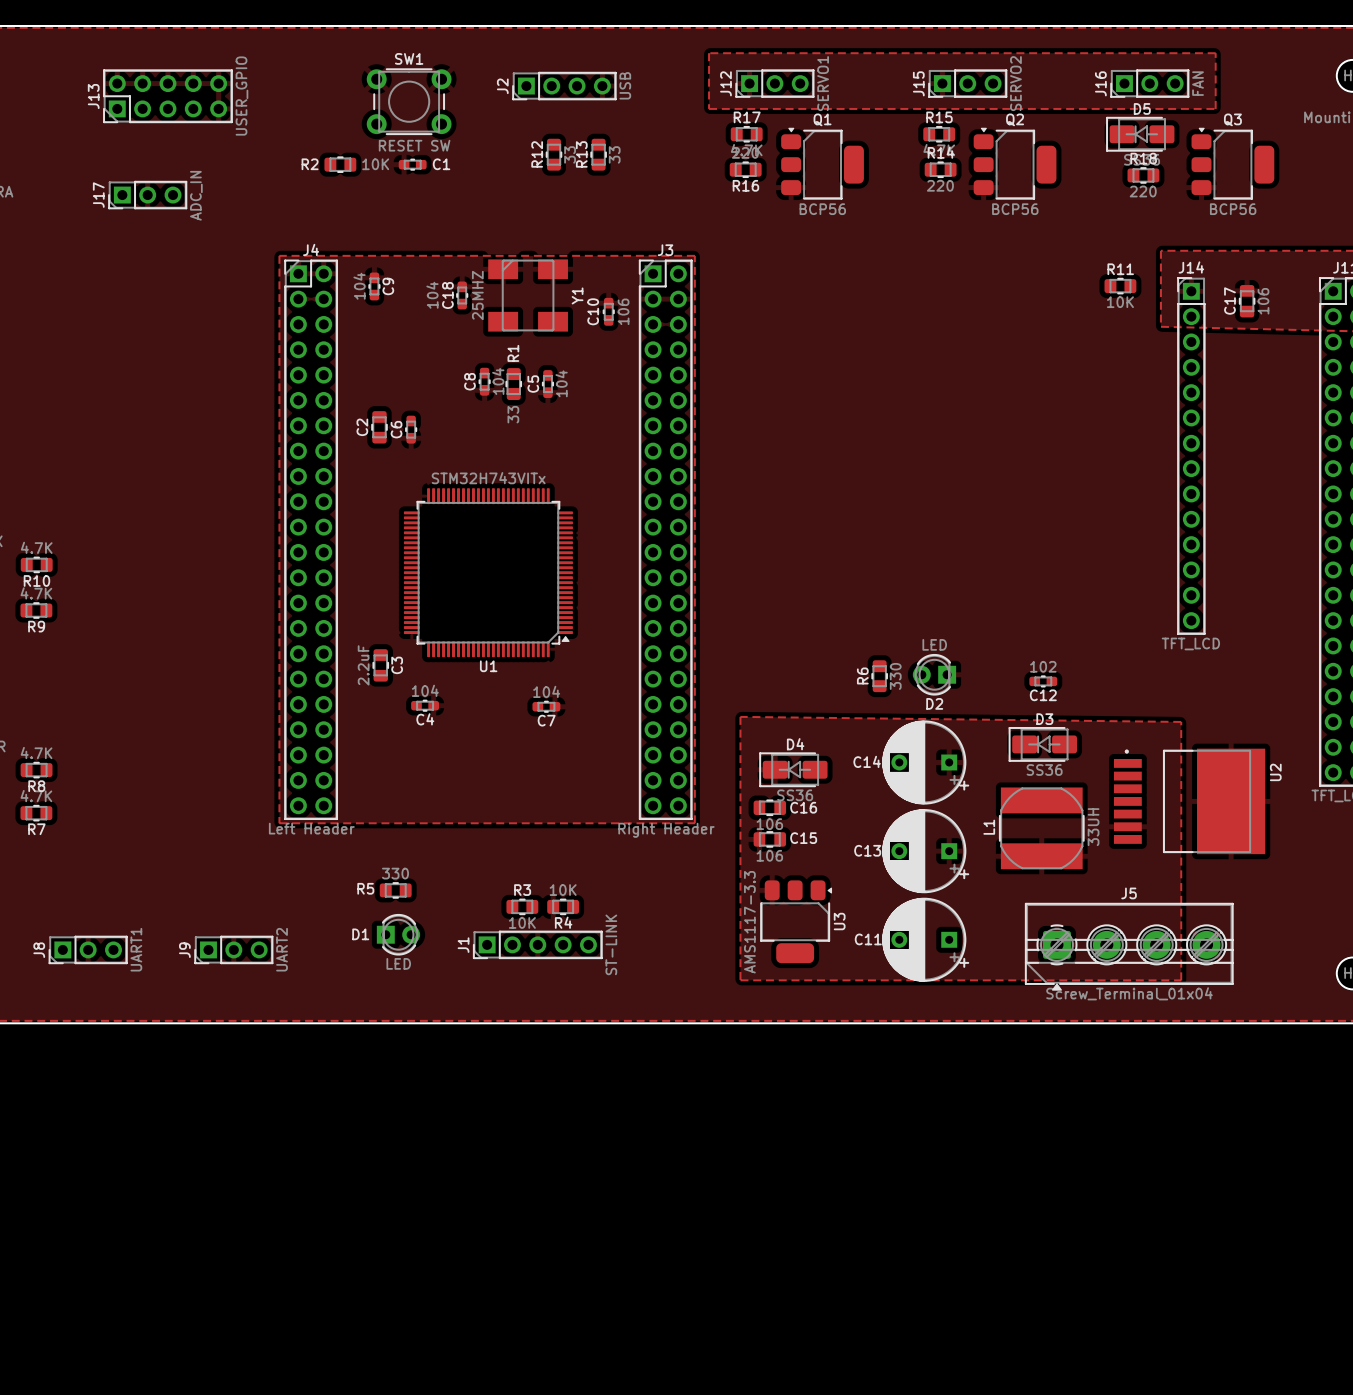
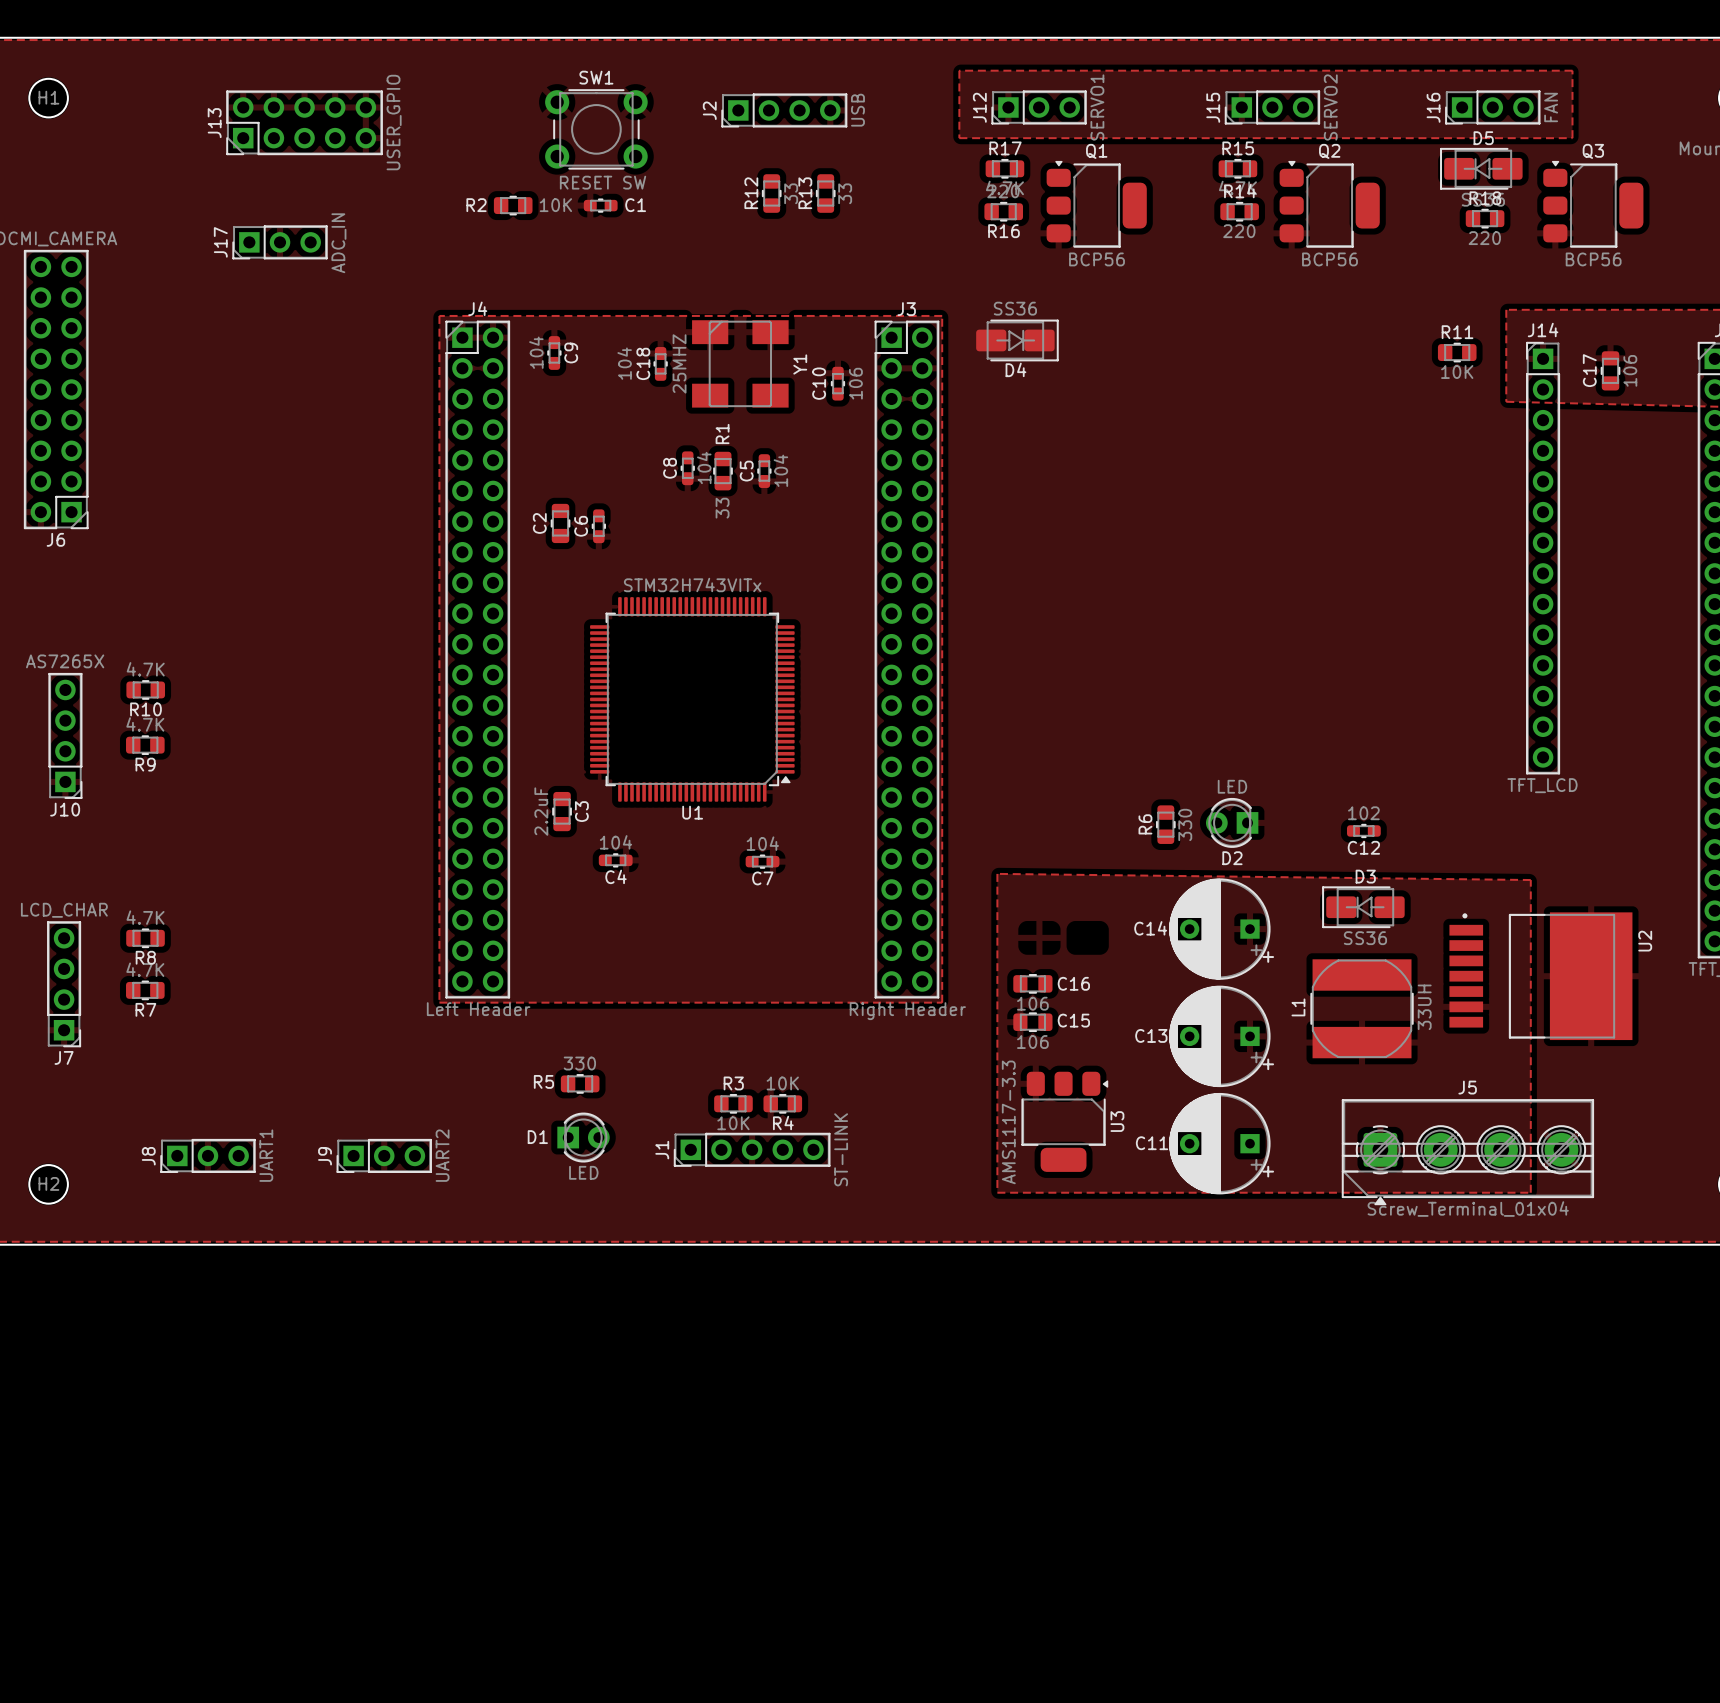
D4 name position: D4 (795, 744) -> D4 (1015, 369)
D4 footprint: [759, 752, 828, 787] -> [976, 319, 1059, 362]
D4 value position: SS36 (795, 795) -> SS36 (1015, 308)

